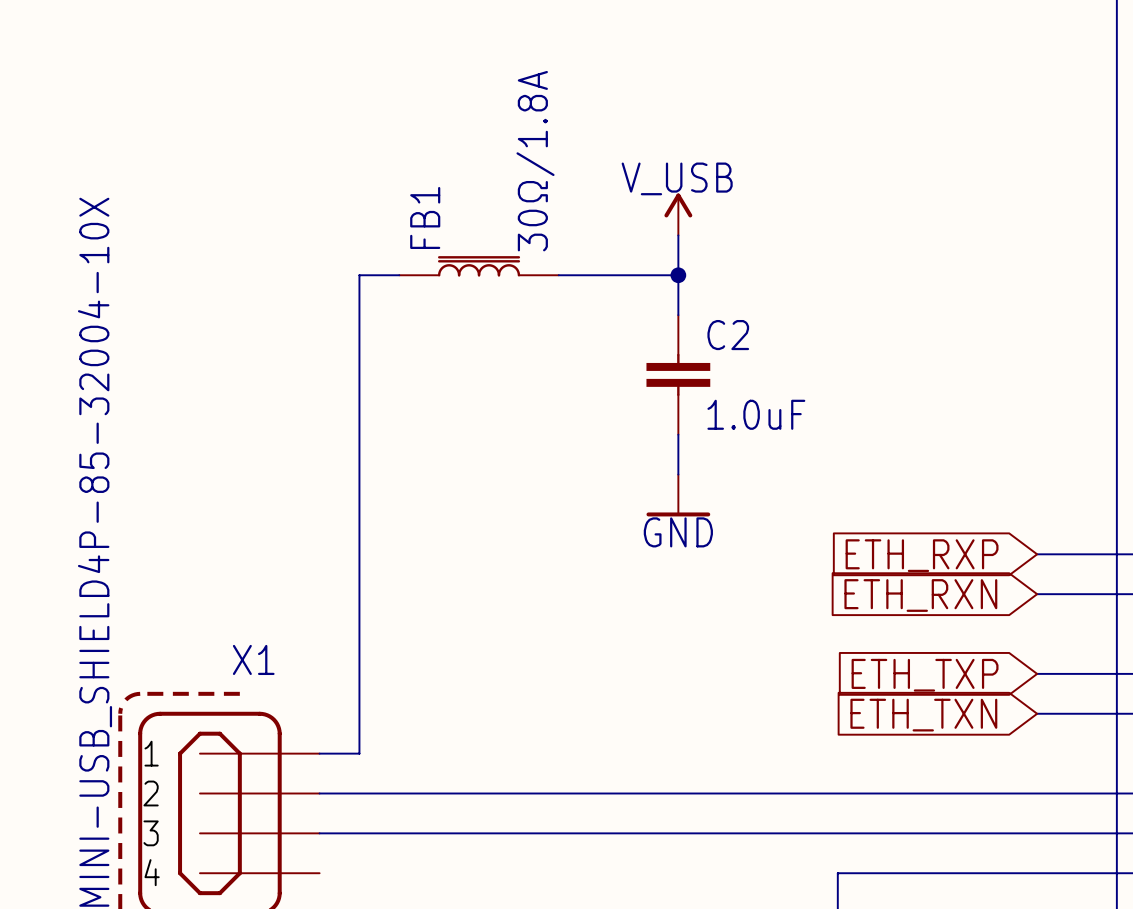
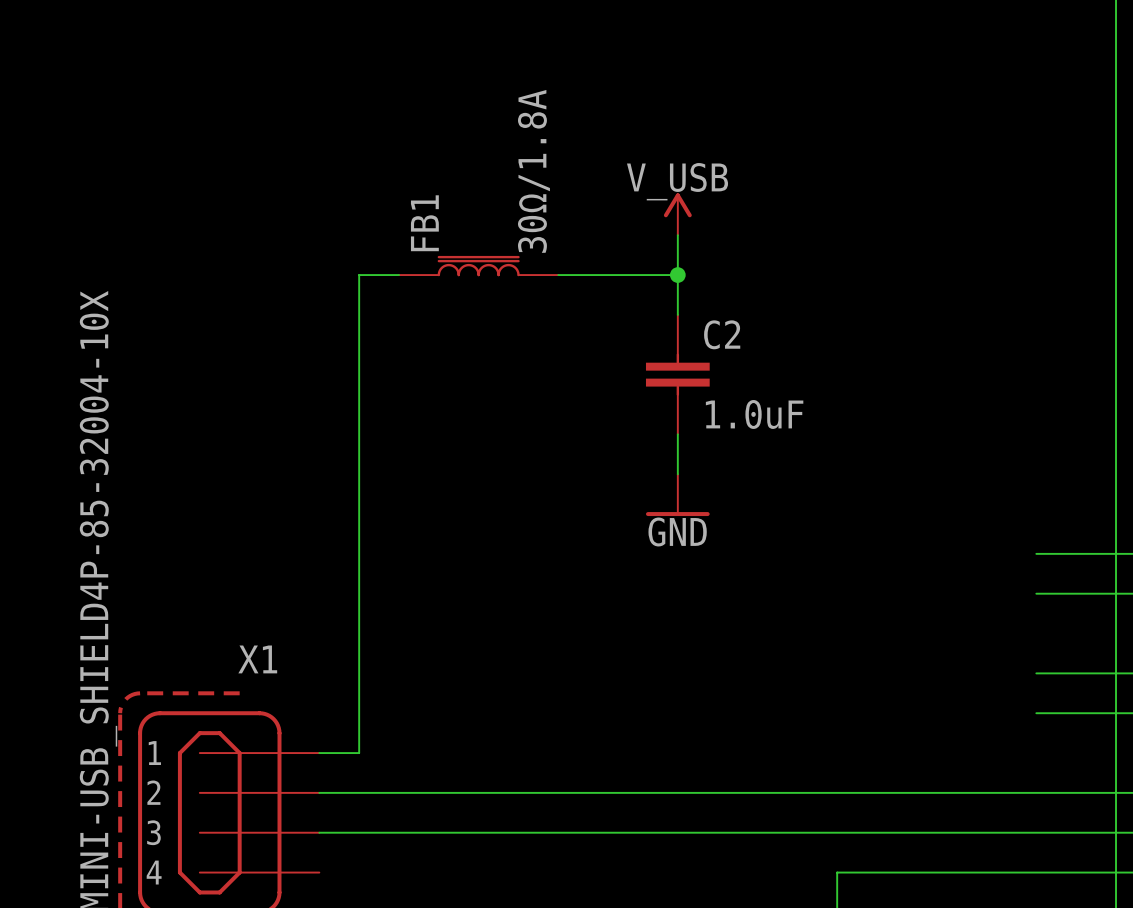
global label: ETH_RXP (922, 555) -> none
global label: ETH_RXN (920, 595) -> none
global label: ETH_TXP (925, 675) -> none
global label: ETH_TXN (923, 715) -> none

